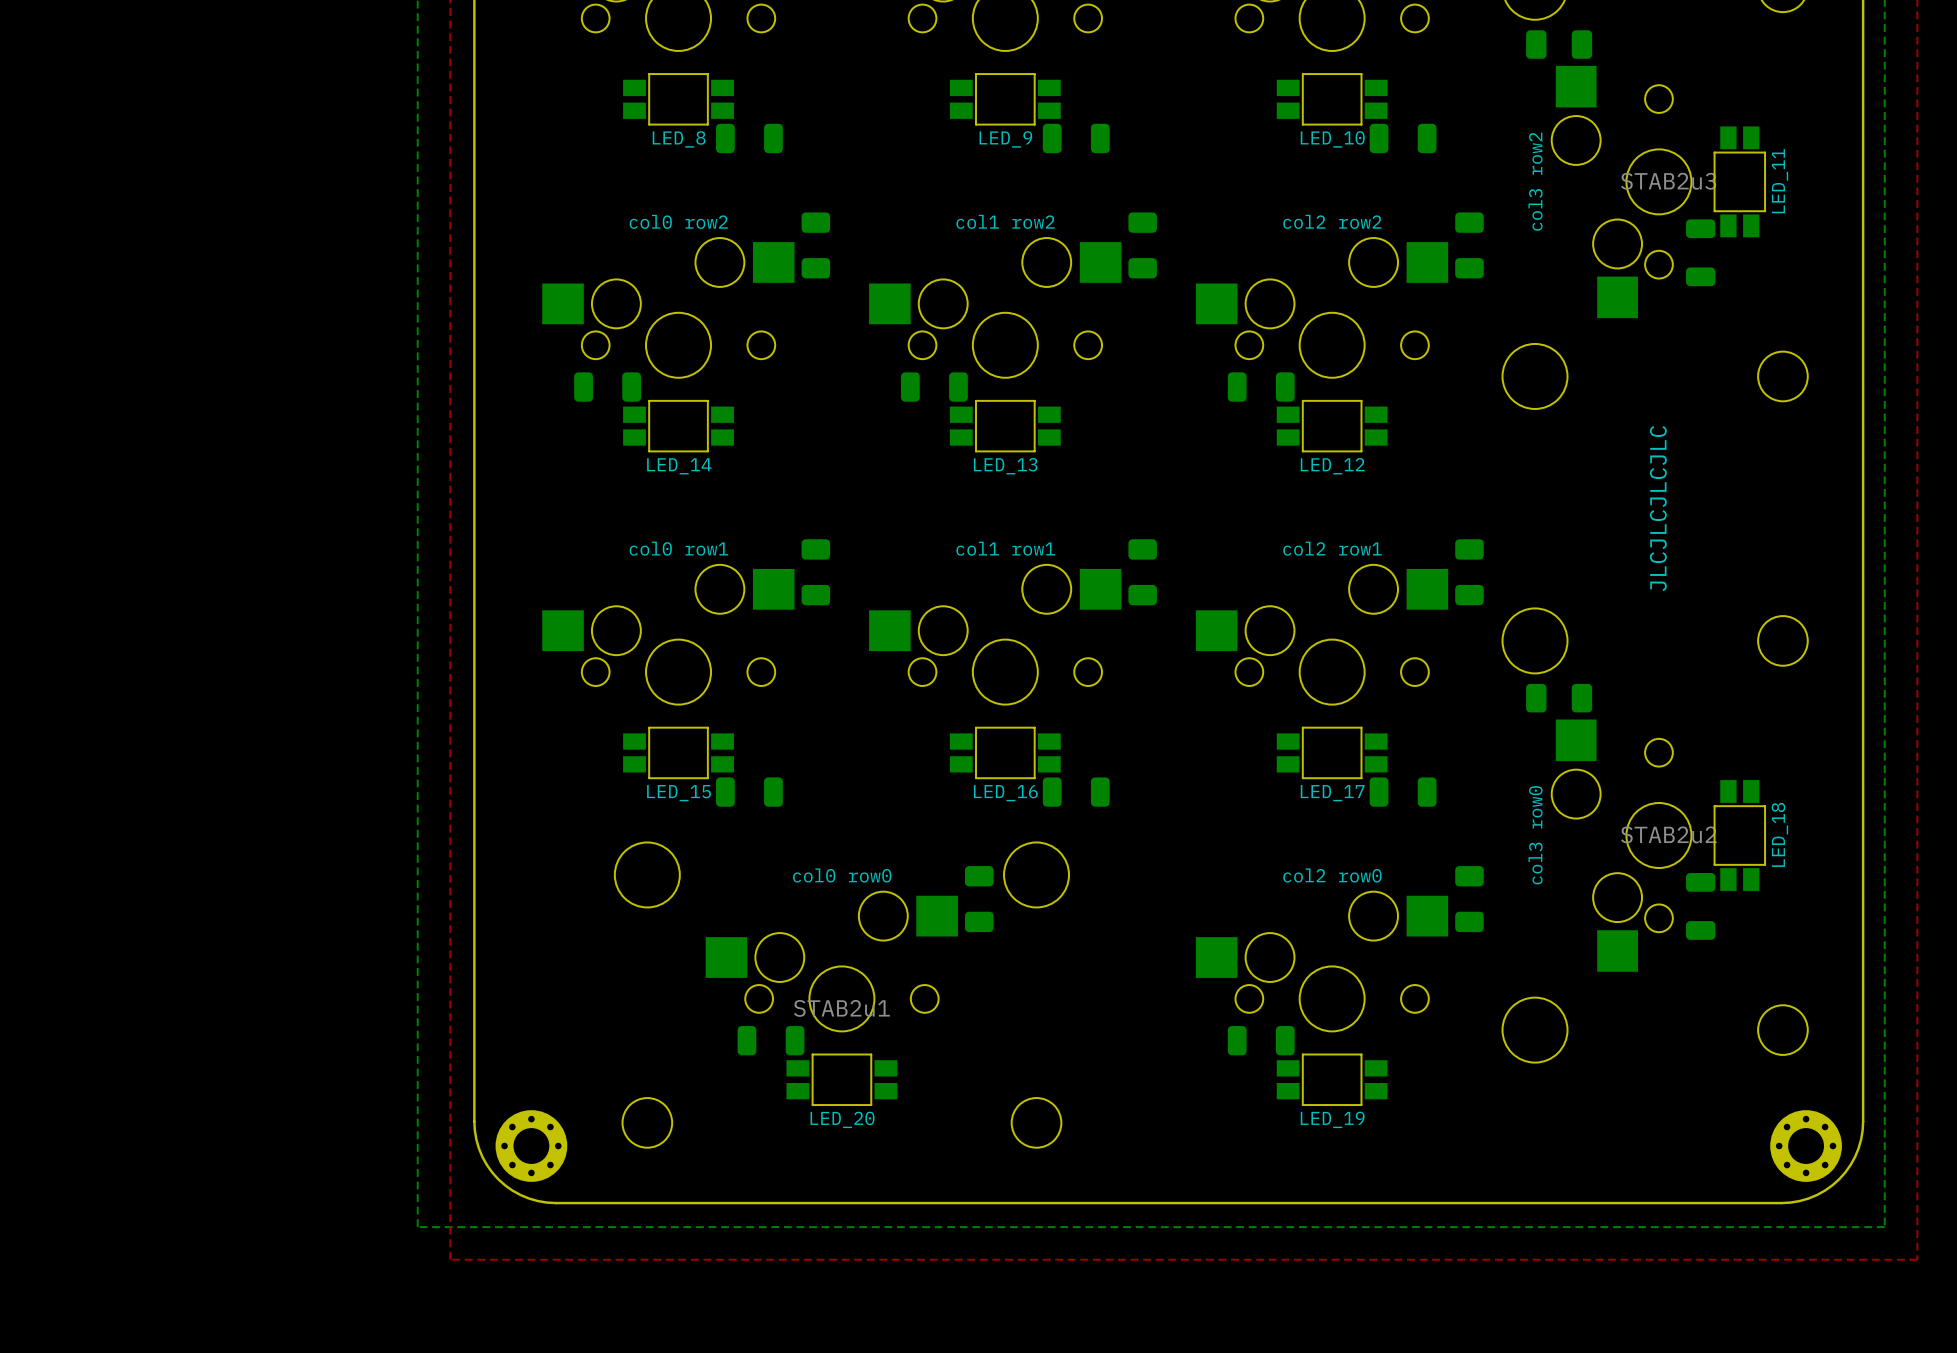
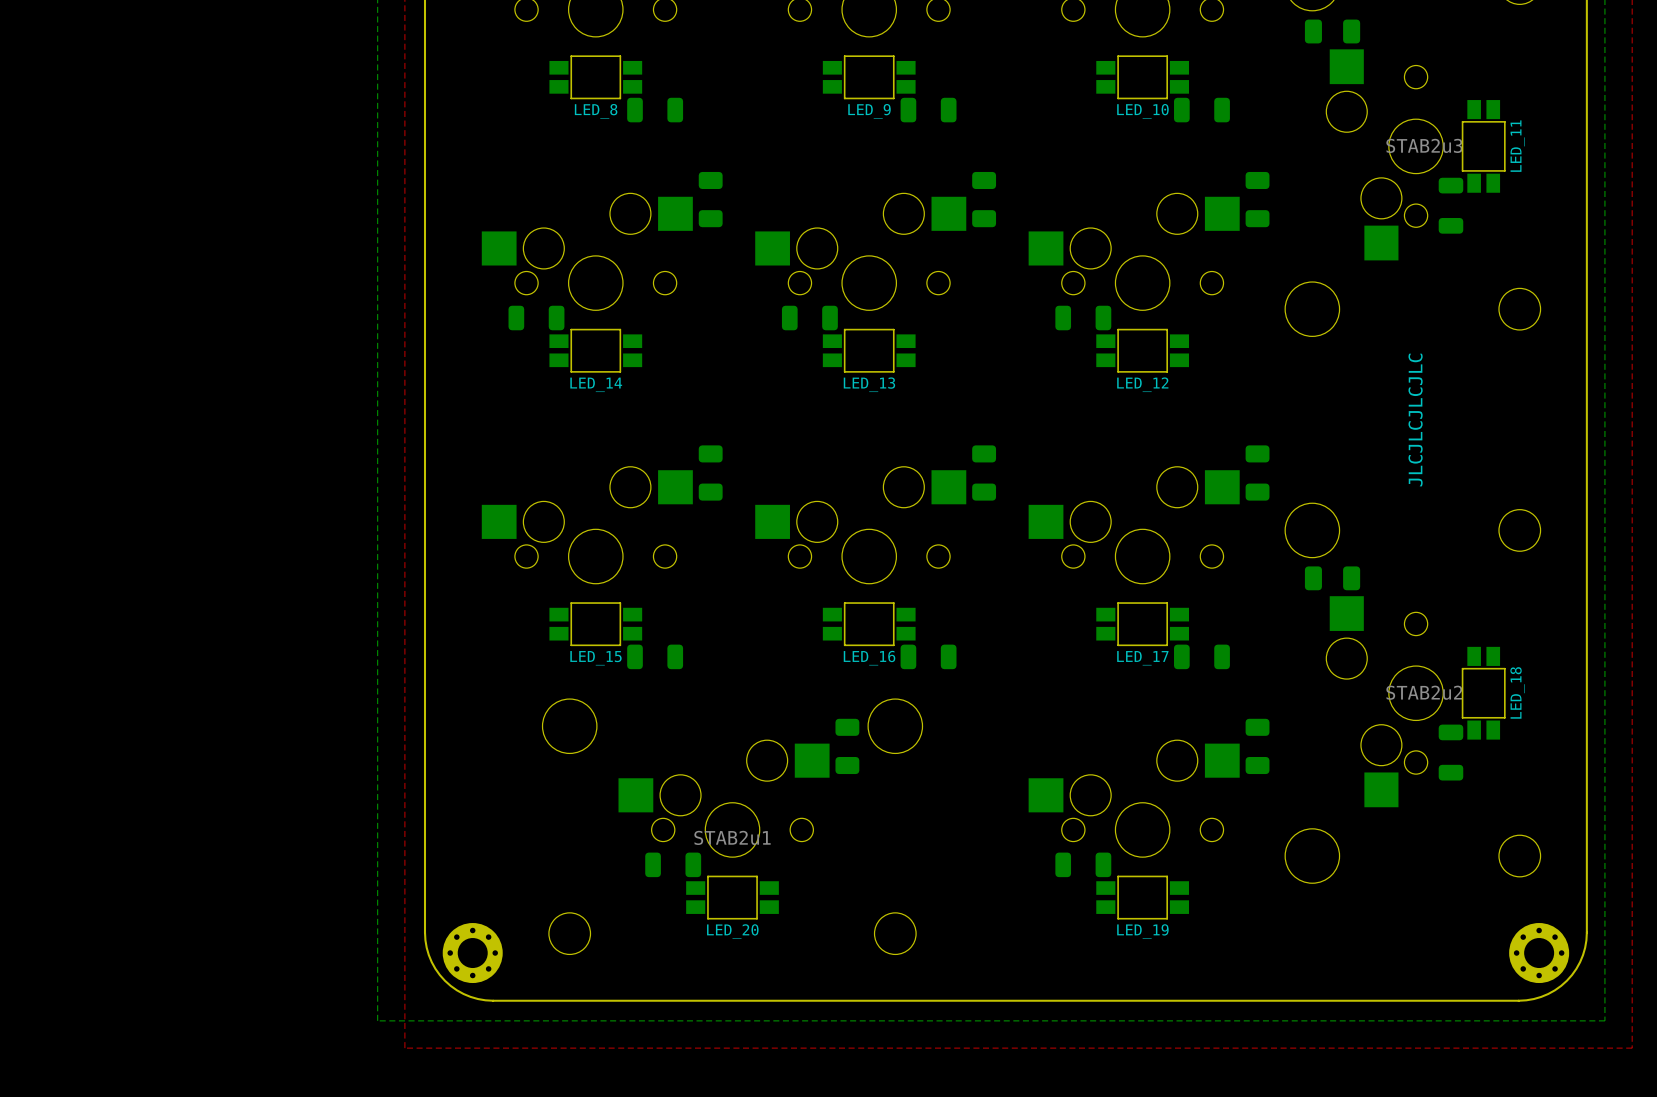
text: col3 row2 (1535, 181) -> none
text: col0 row2 (678, 221) -> none
text: col1 row2 (1005, 221) -> none
text: col2 row2 (1332, 221) -> none
text: col0 row1 (678, 548) -> none
text: col1 row1 (1005, 548) -> none
text: col2 row1 (1332, 548) -> none
text: col3 row0 (1535, 835) -> none
text: col0 row0 (842, 875) -> none
text: col2 row0 (1332, 875) -> none

